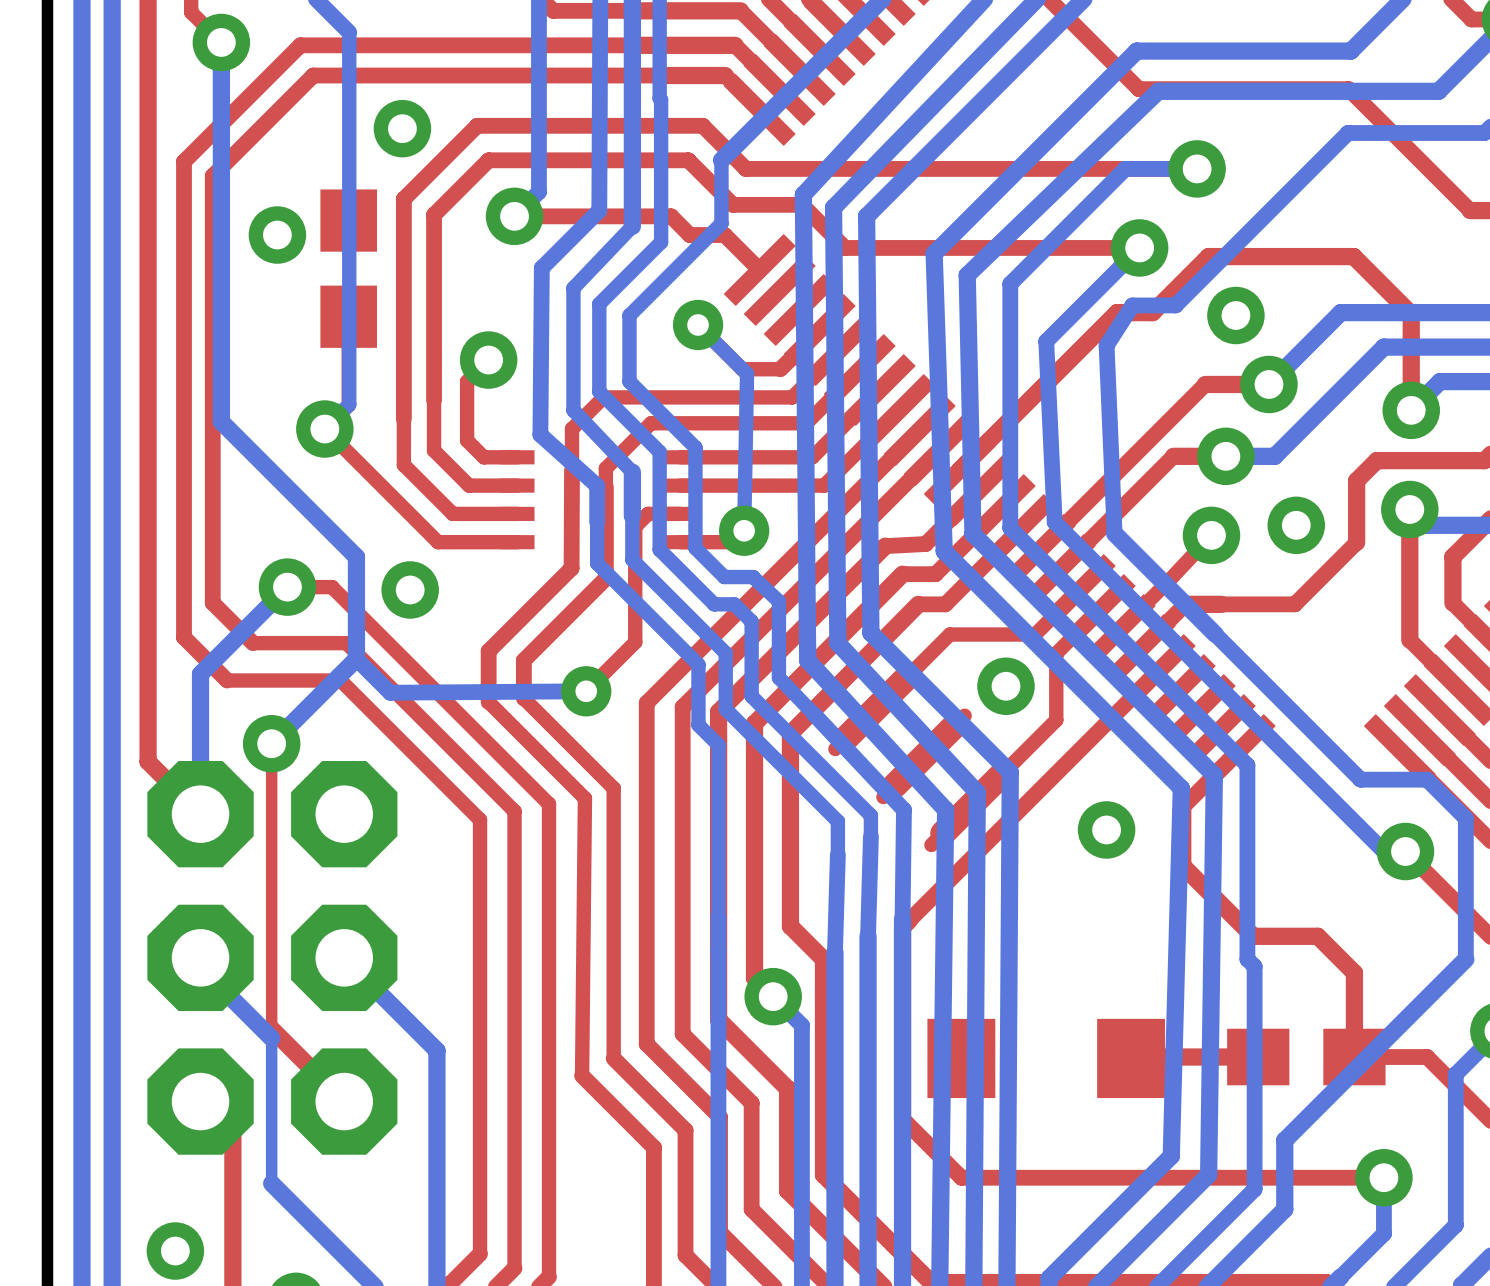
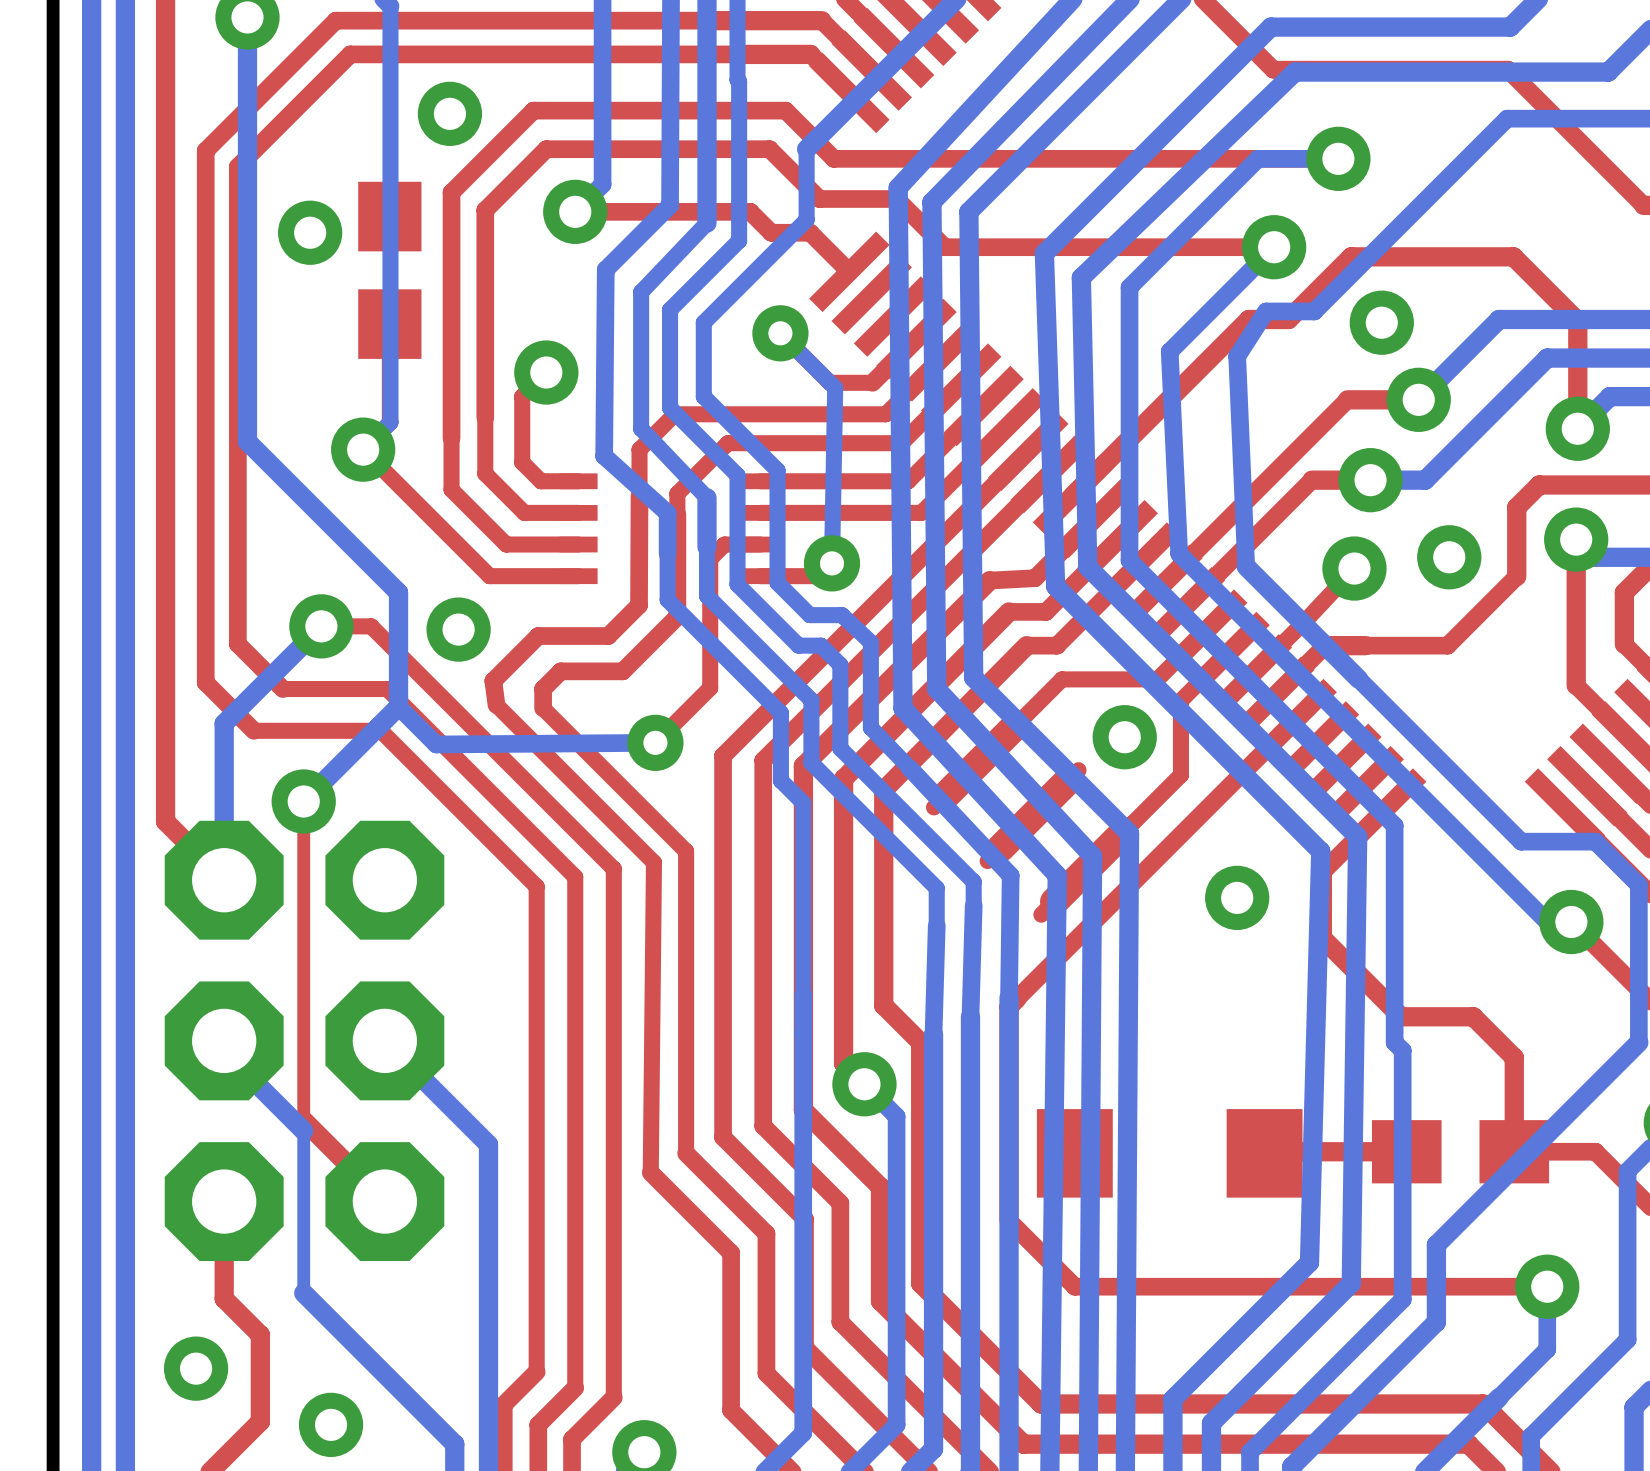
top track: (544, 595) (488, 651) (488, 702) -> (608, 636) (538, 636) (493, 681) (496, 705) (546, 754)
top track: (557, 627) (523, 660) (523, 698) -> (622, 671) (560, 671) (543, 689) (543, 708) (585, 750)
top track: (200, 1101) (232, 1133) (232, 1220) -> (224, 1201) (224, 1298) (260, 1334)

